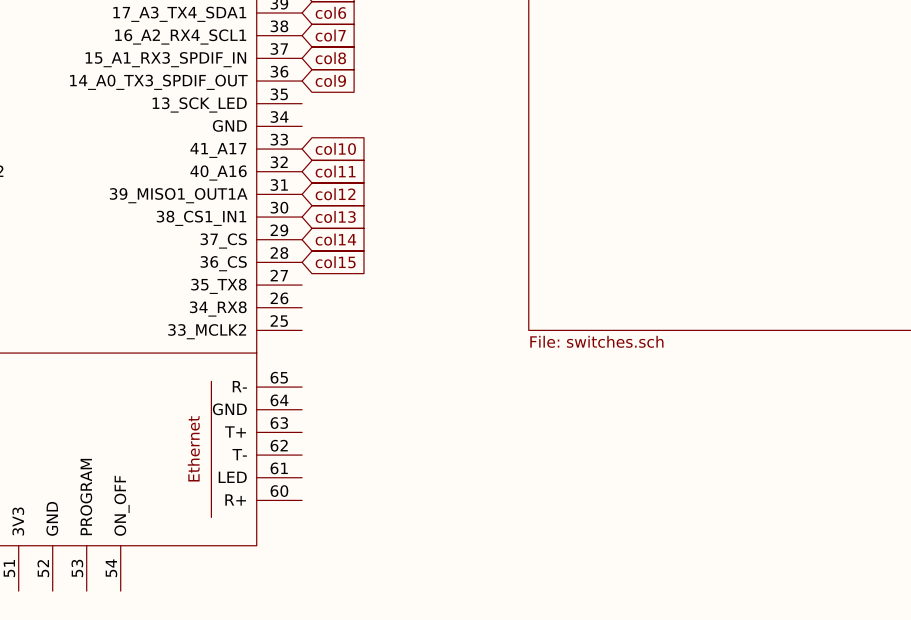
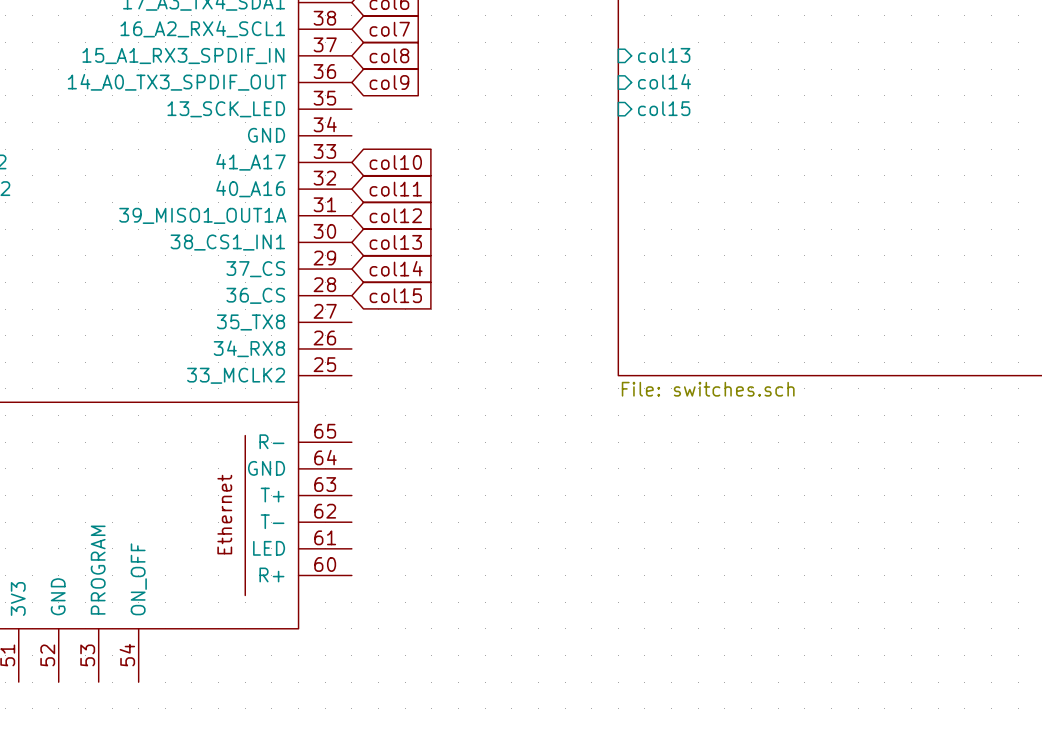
sheet pin: none -> col13 (664, 55)
sheet pin: none -> col14 (664, 81)
sheet pin: none -> col15 (664, 108)

